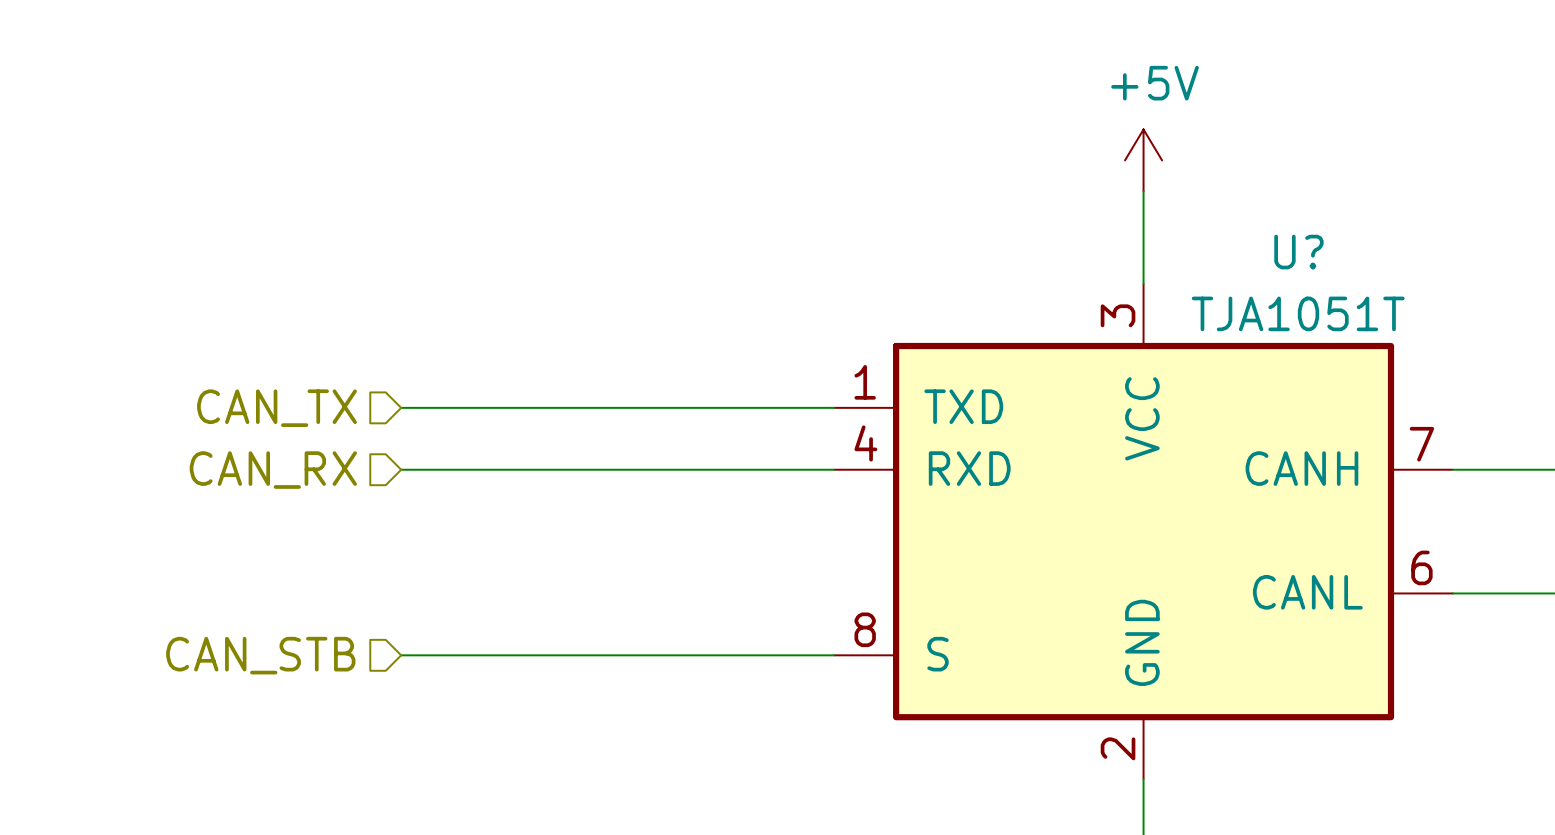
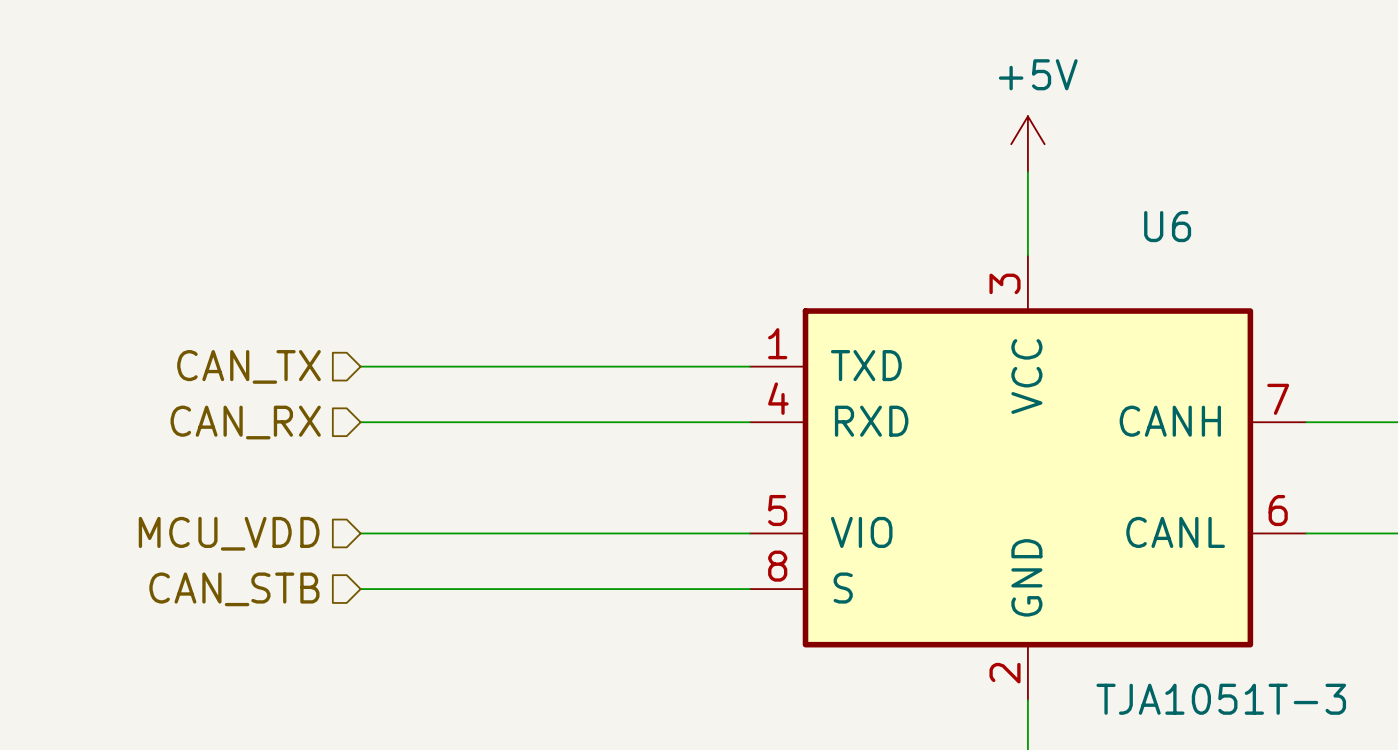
U?: TJA1051T (1143, 531) -> none
U6: none -> TJA1051T-3 (1027, 477)
hierarchical label: none -> MCU_VDD (229, 533)
wire: none -> (360, 533) (749, 533)

